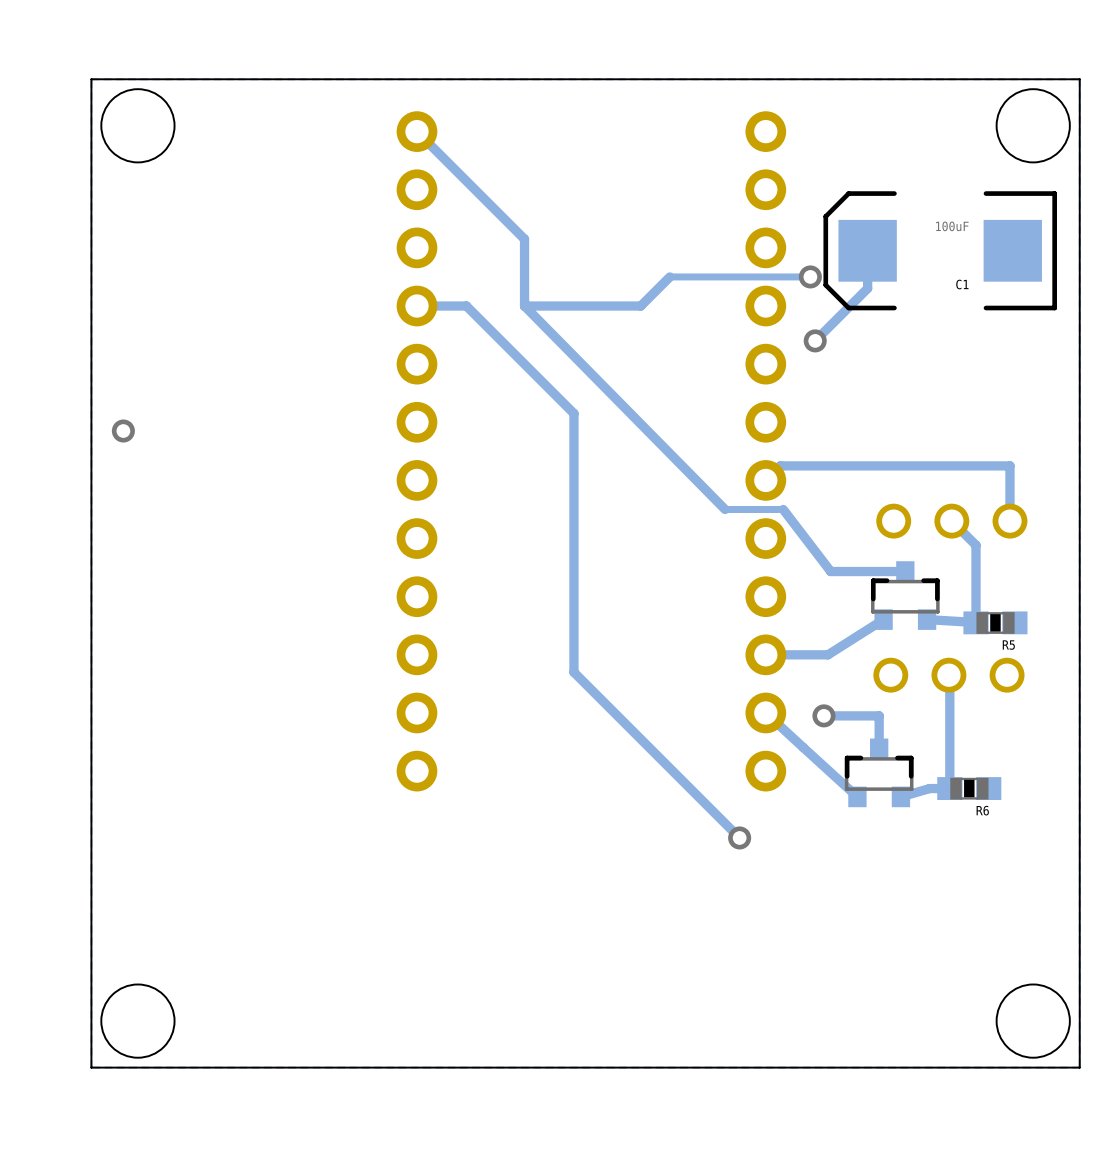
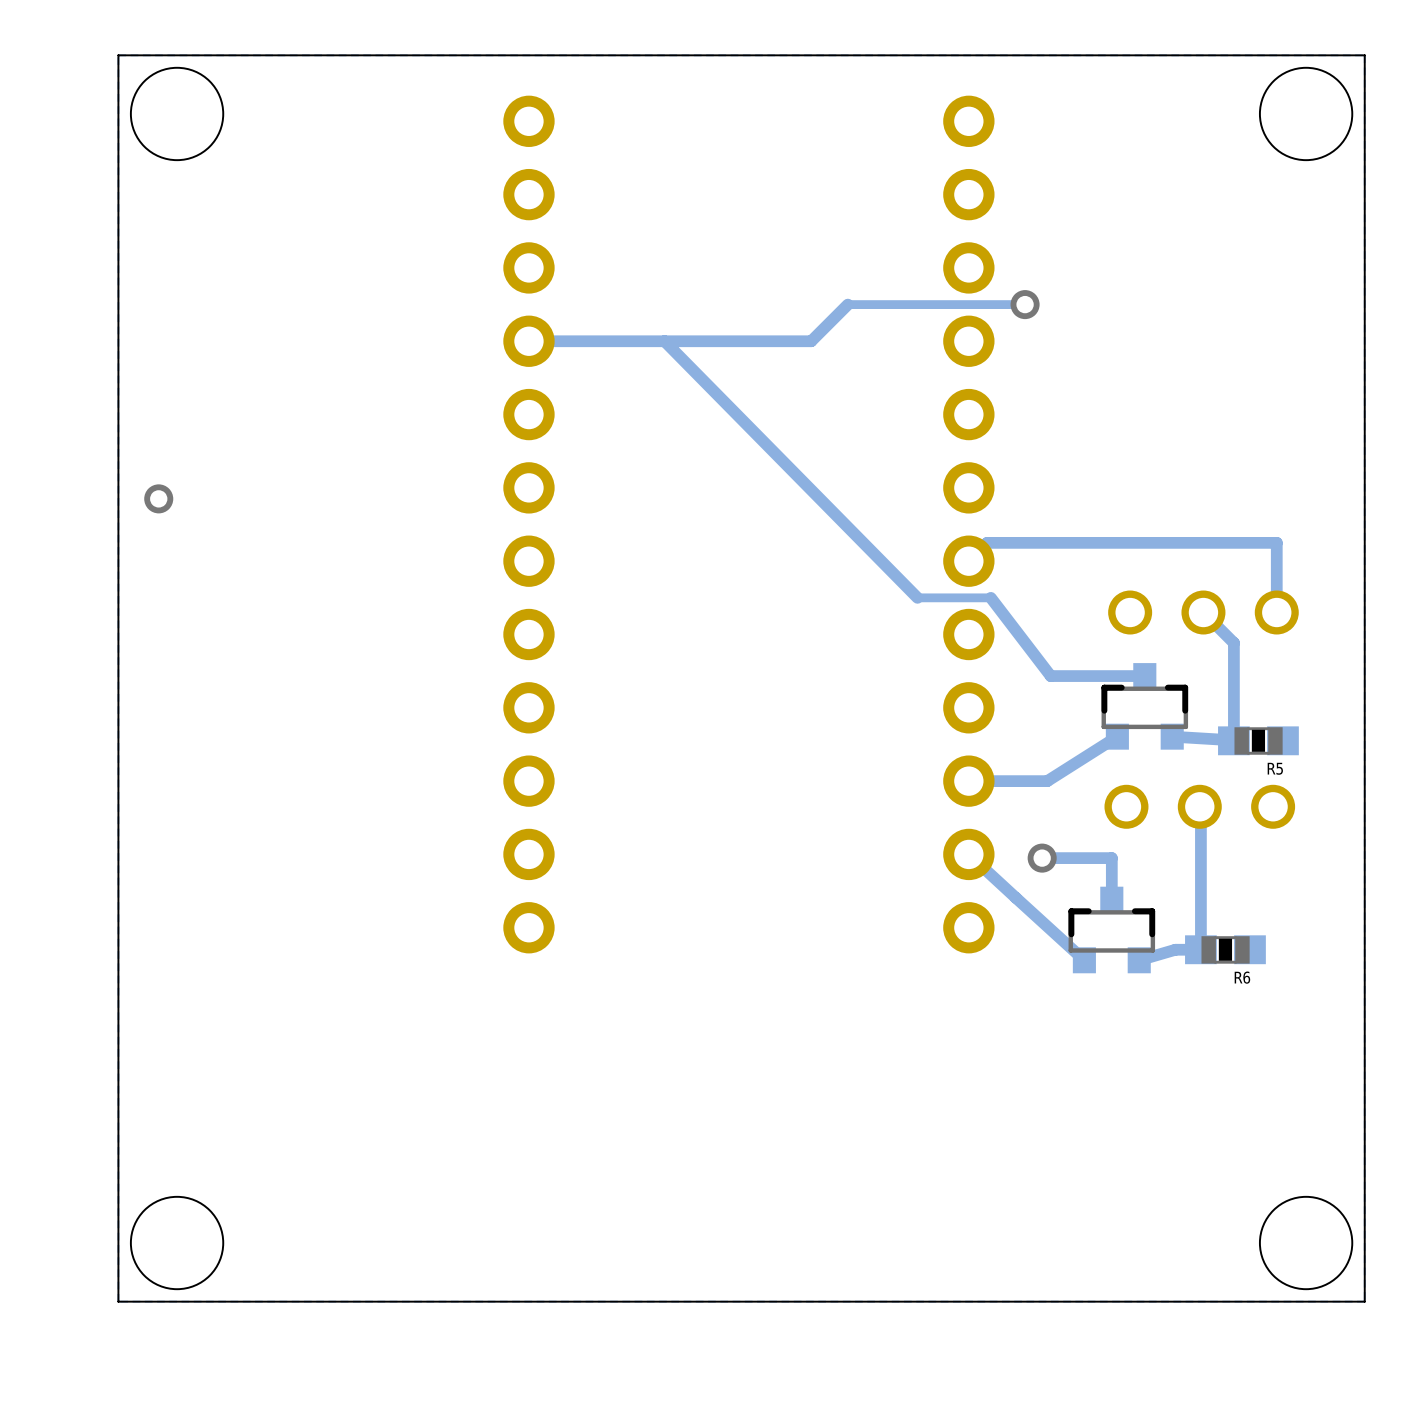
track: (416, 131) (524, 239) (524, 306) -> (591, 341) (664, 341)
track: (867, 250) (867, 288) (815, 340) -> none
C1: 100uF (940, 250) -> none
track: (466, 306) (573, 413) (573, 672) (739, 837) -> none
via: (815, 340) -> none
via: (739, 837) -> none

